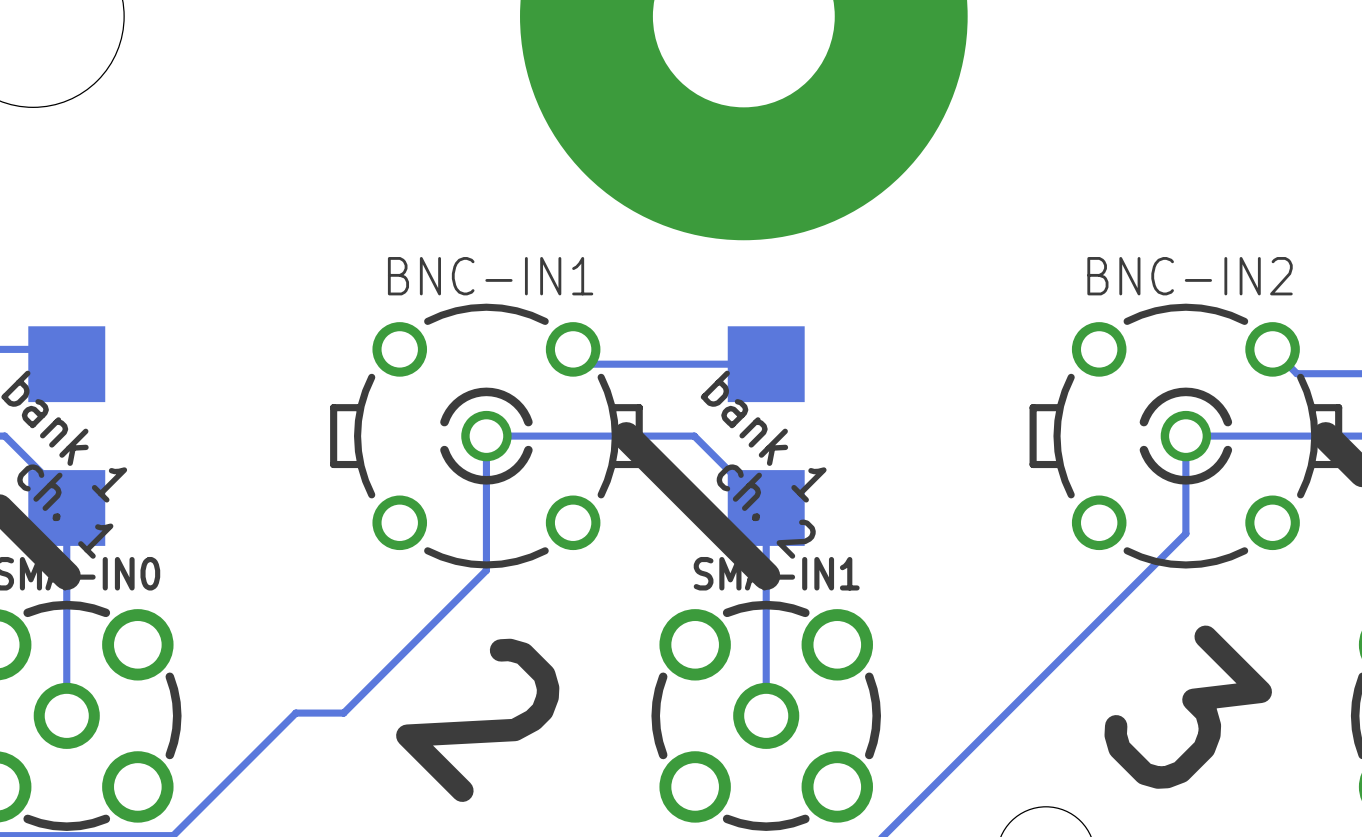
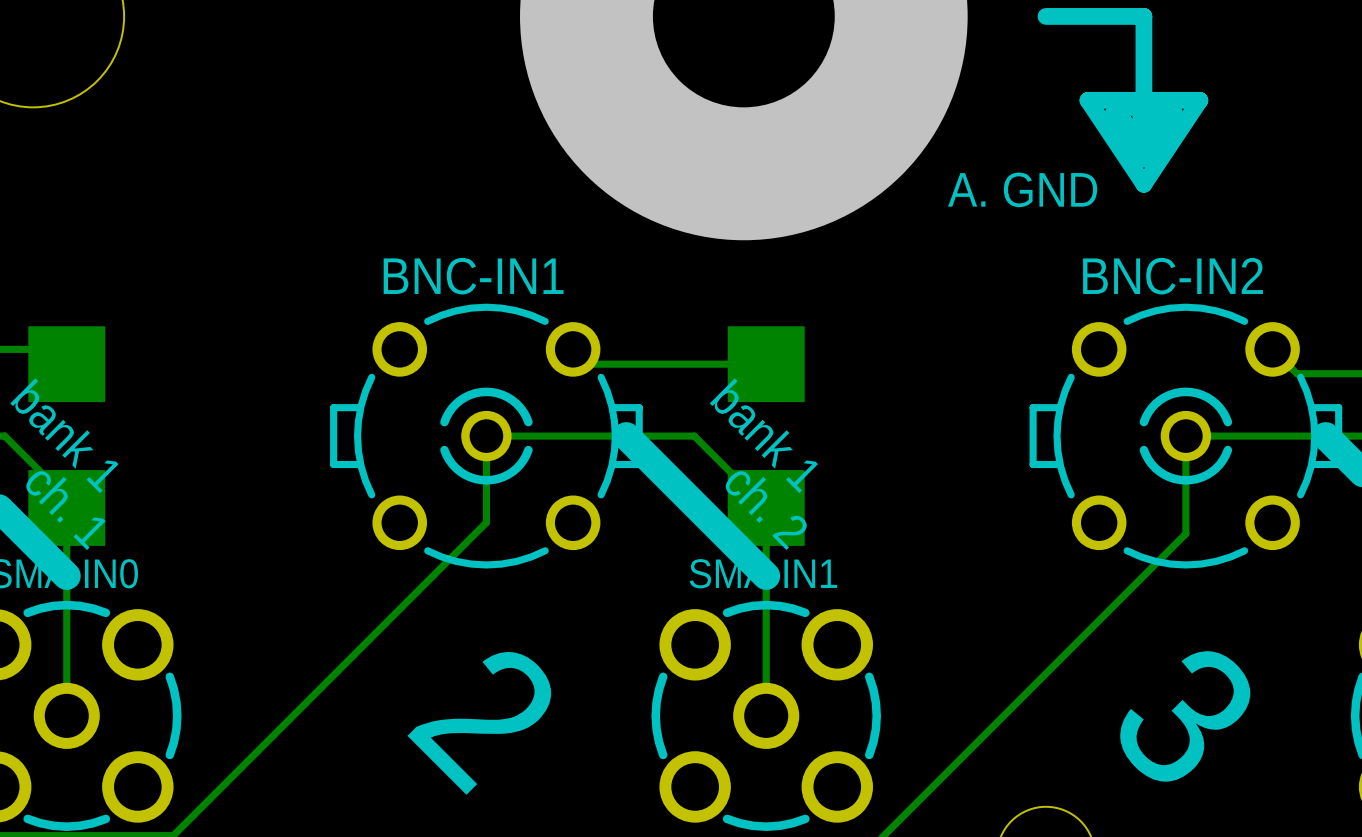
line: none -> (1046, 16) (1143, 16) (1143, 100) (1115, 114) (1143, 156) (1171, 114) (1143, 114) (1143, 128)
line: none -> (1087, 100) (1199, 100) (1143, 184) (1087, 100)
text: none -> A. GND (1022, 189)
bottom track: (486, 522) (486, 570) (343, 713) (295, 713) -> (486, 522) (295, 713)

